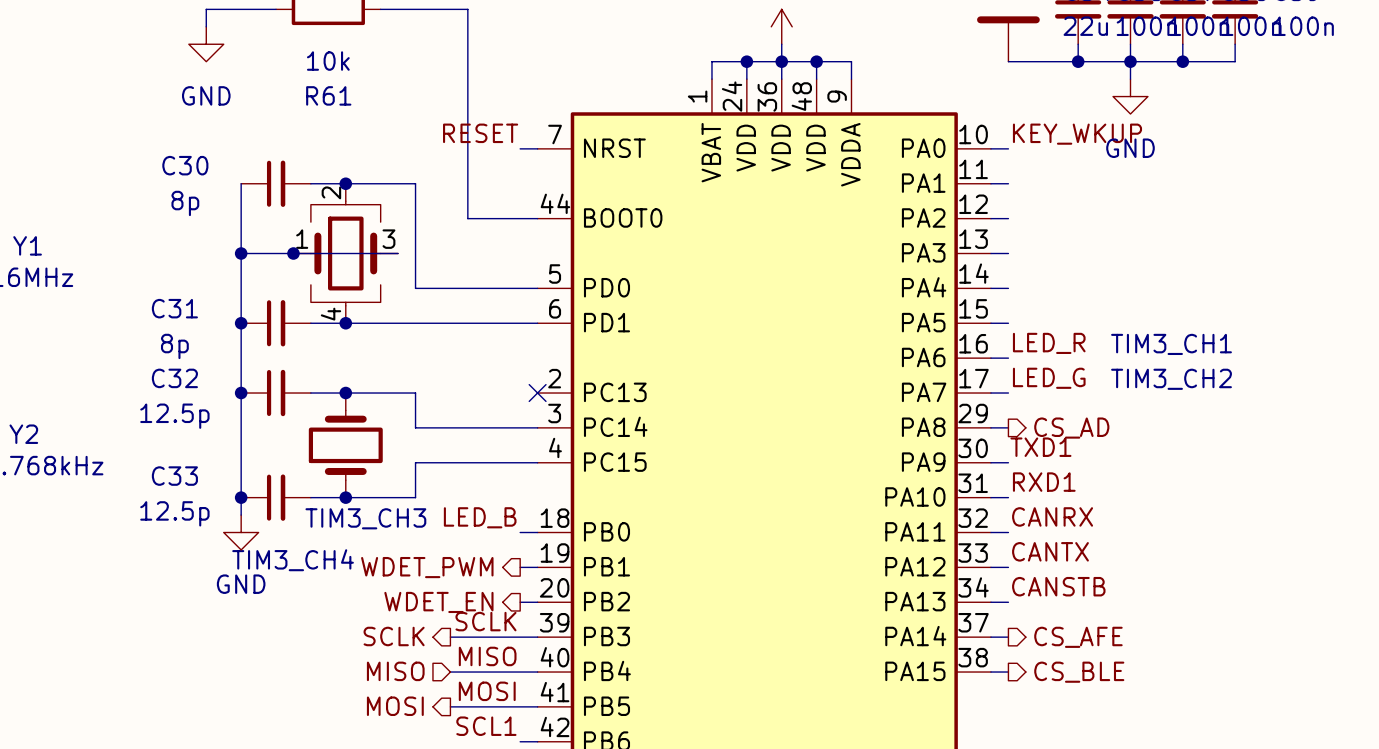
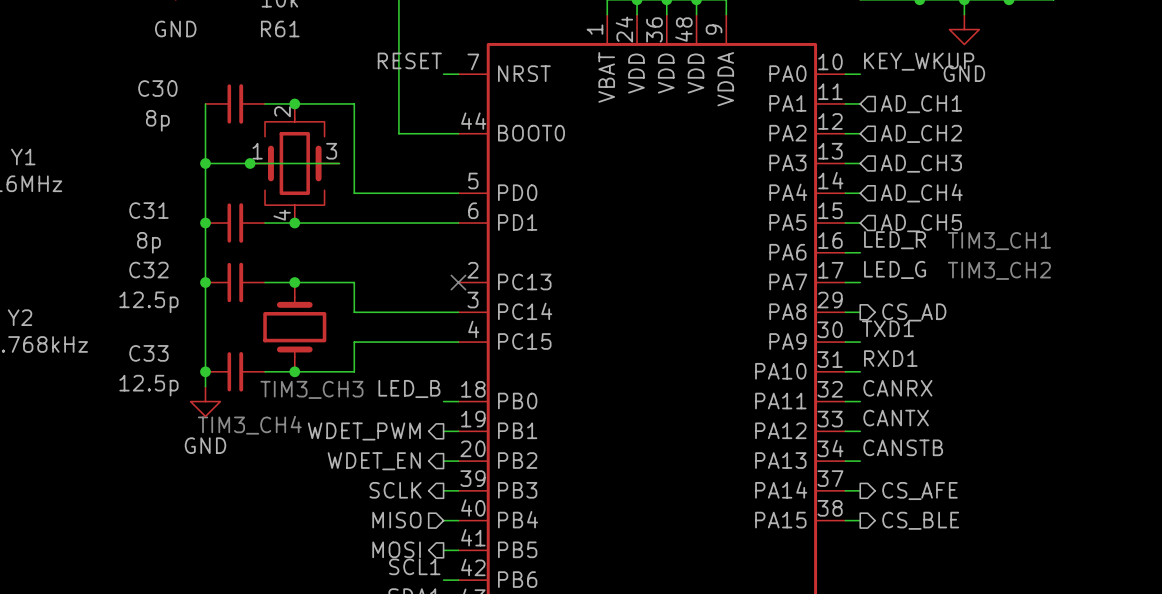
hierarchical label: none -> AD_CH1 (921, 104)
hierarchical label: none -> AD_CH2 (921, 133)
hierarchical label: none -> AD_CH3 (921, 163)
hierarchical label: none -> AD_CH4 (921, 193)
hierarchical label: none -> AD_CH5 (921, 223)
label: SCLK (485, 621) -> none
hierarchical label position: SCLK (394, 636) -> SCLK (395, 490)
wire: (450, 637) (520, 637) -> none
label: MISO (487, 656) -> none
hierarchical label position: MISO (395, 671) -> MISO (396, 520)
wire: (450, 672) (520, 672) -> none
label: MOSI (487, 691) -> none
hierarchical label position: MOSI (395, 706) -> MOSI (396, 549)
wire: (450, 706) (520, 706) -> none

